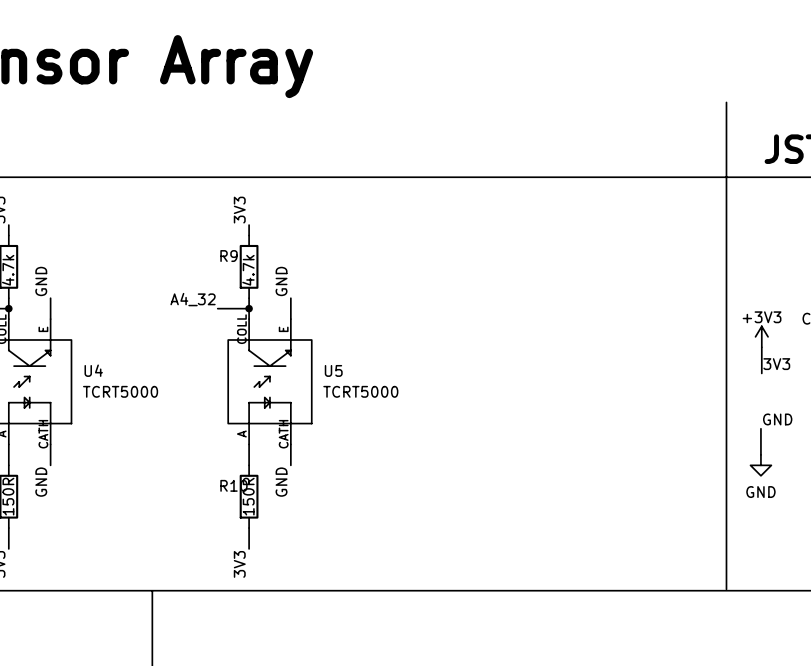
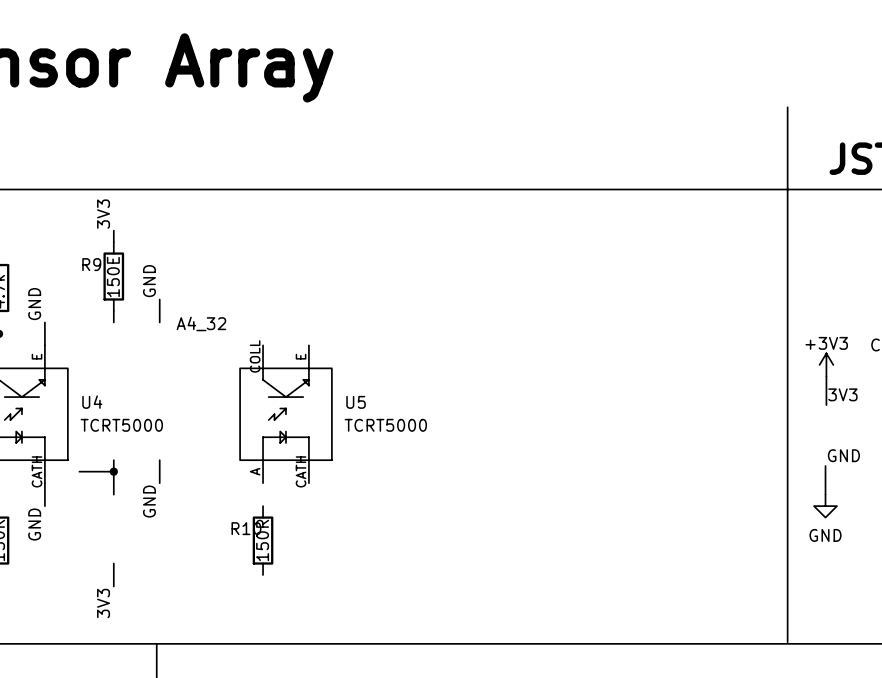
label position: 3V3 (239, 210) -> 3V3 (103, 214)
wire: (249, 225) (249, 235) -> (113, 230) (113, 242)
label: none -> GND (149, 281)
R9 position: (249, 266) -> (113, 276)
R9 value: 4.7k (248, 270) -> 150E (113, 276)
label: GND (281, 281) -> none
wire: none -> (113, 310) (113, 322)
wire: (249, 298) (249, 319) -> (159, 299) (159, 322)
wire: (290, 298) (290, 319) -> none
wire: (217, 308) (249, 308) -> (79, 471) (113, 471)
junction: (249, 308) -> none
wire: none -> (113, 460) (113, 494)
junction: none -> (113, 471)
wire: (249, 444) (249, 465) -> (159, 460) (159, 483)
wire: (290, 444) (290, 465) -> none
label: none -> GND (149, 501)
label: GND (281, 482) -> none
wire: (249, 528) (249, 548) -> (113, 563) (113, 586)
label position: 3V3 (239, 564) -> 3V3 (103, 603)

